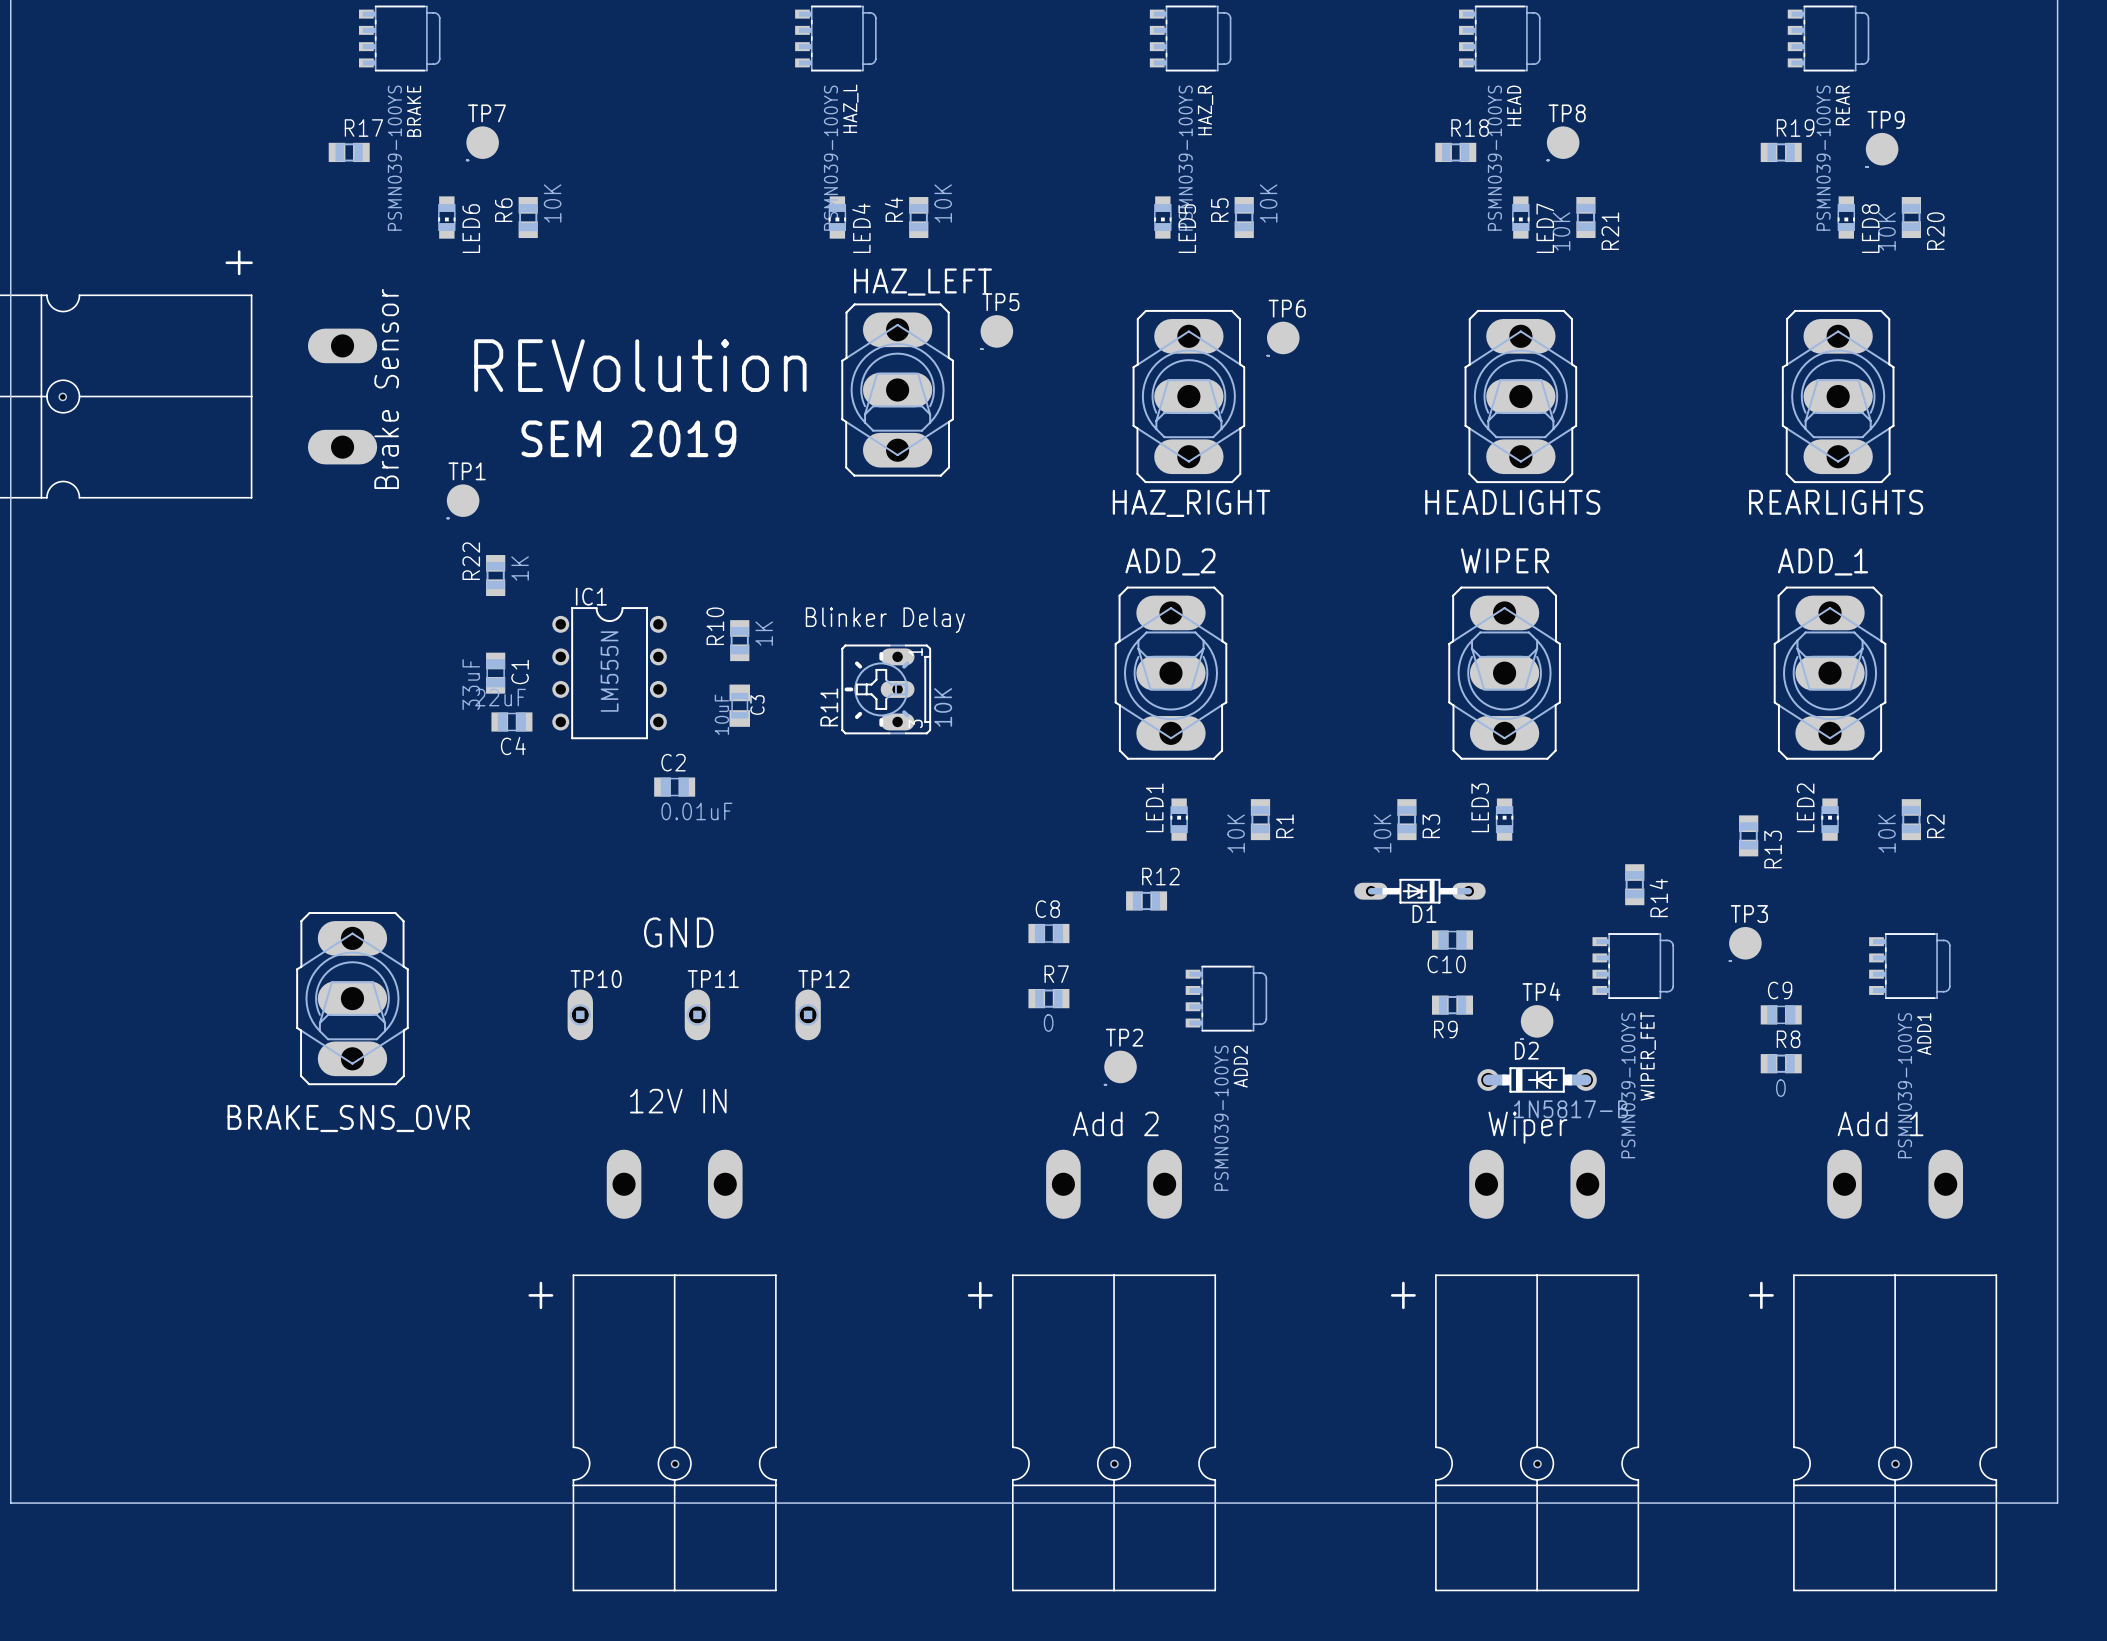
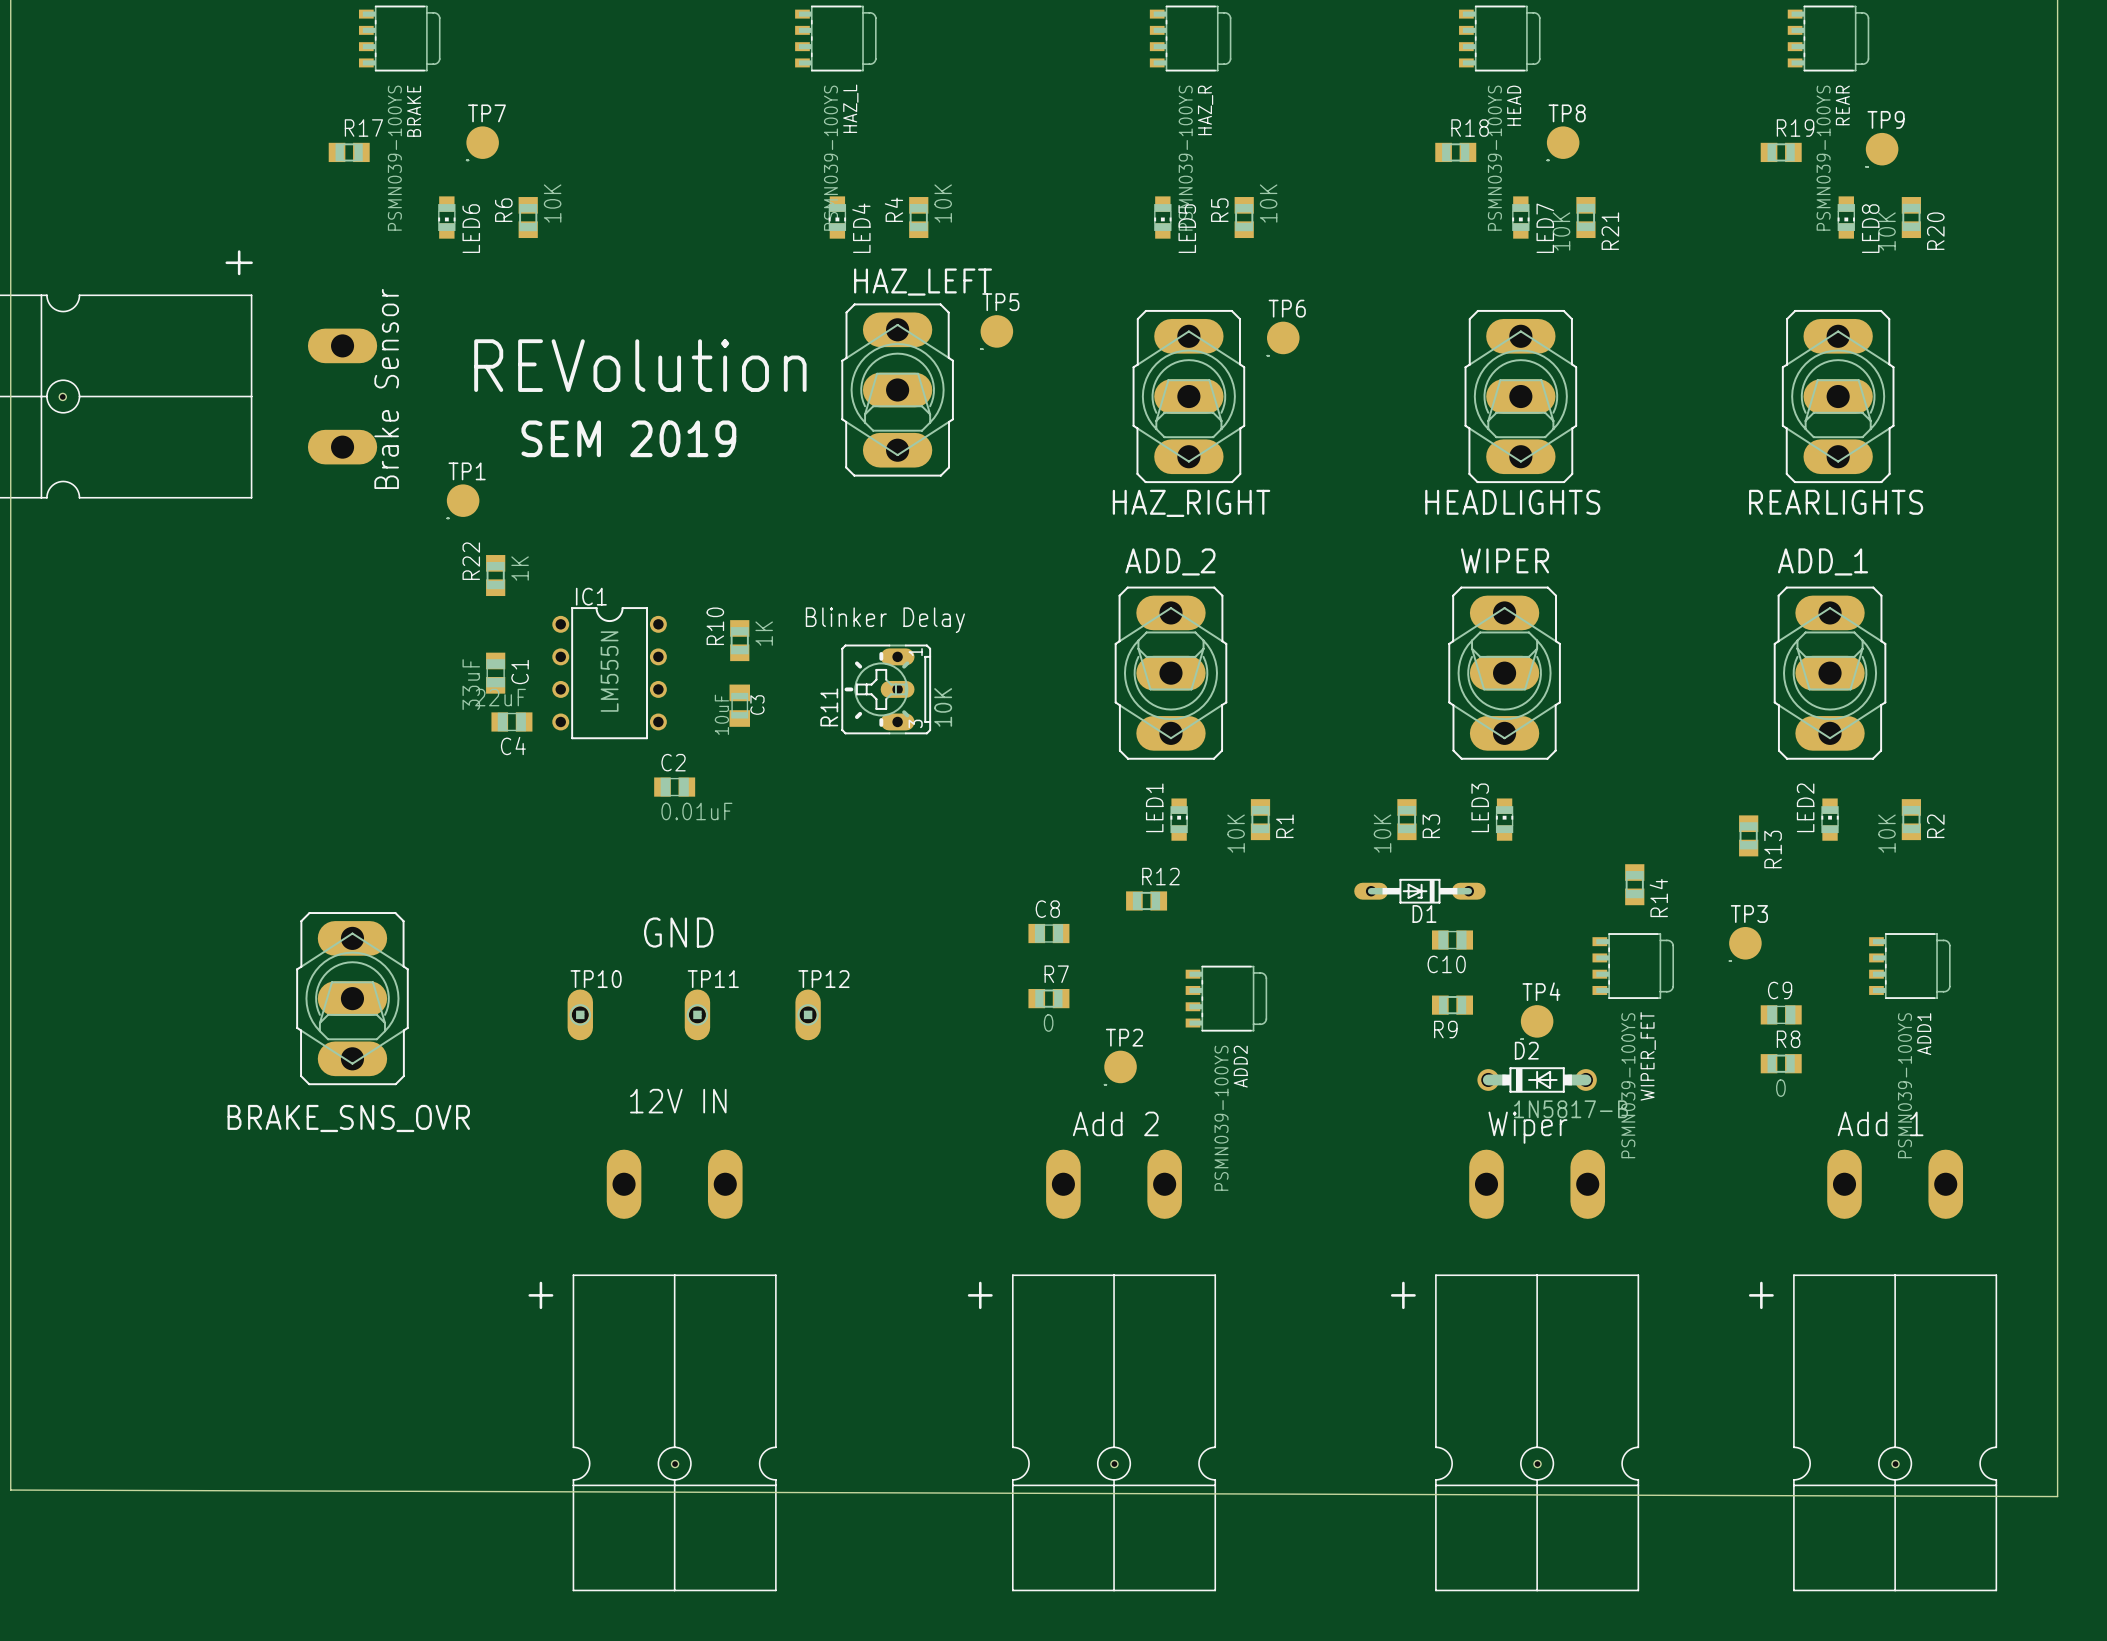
board edge: (10, 1490) (10, 1503) (2057, 1503) (2057, 1496) -> (10, 1490) (2057, 1496)

